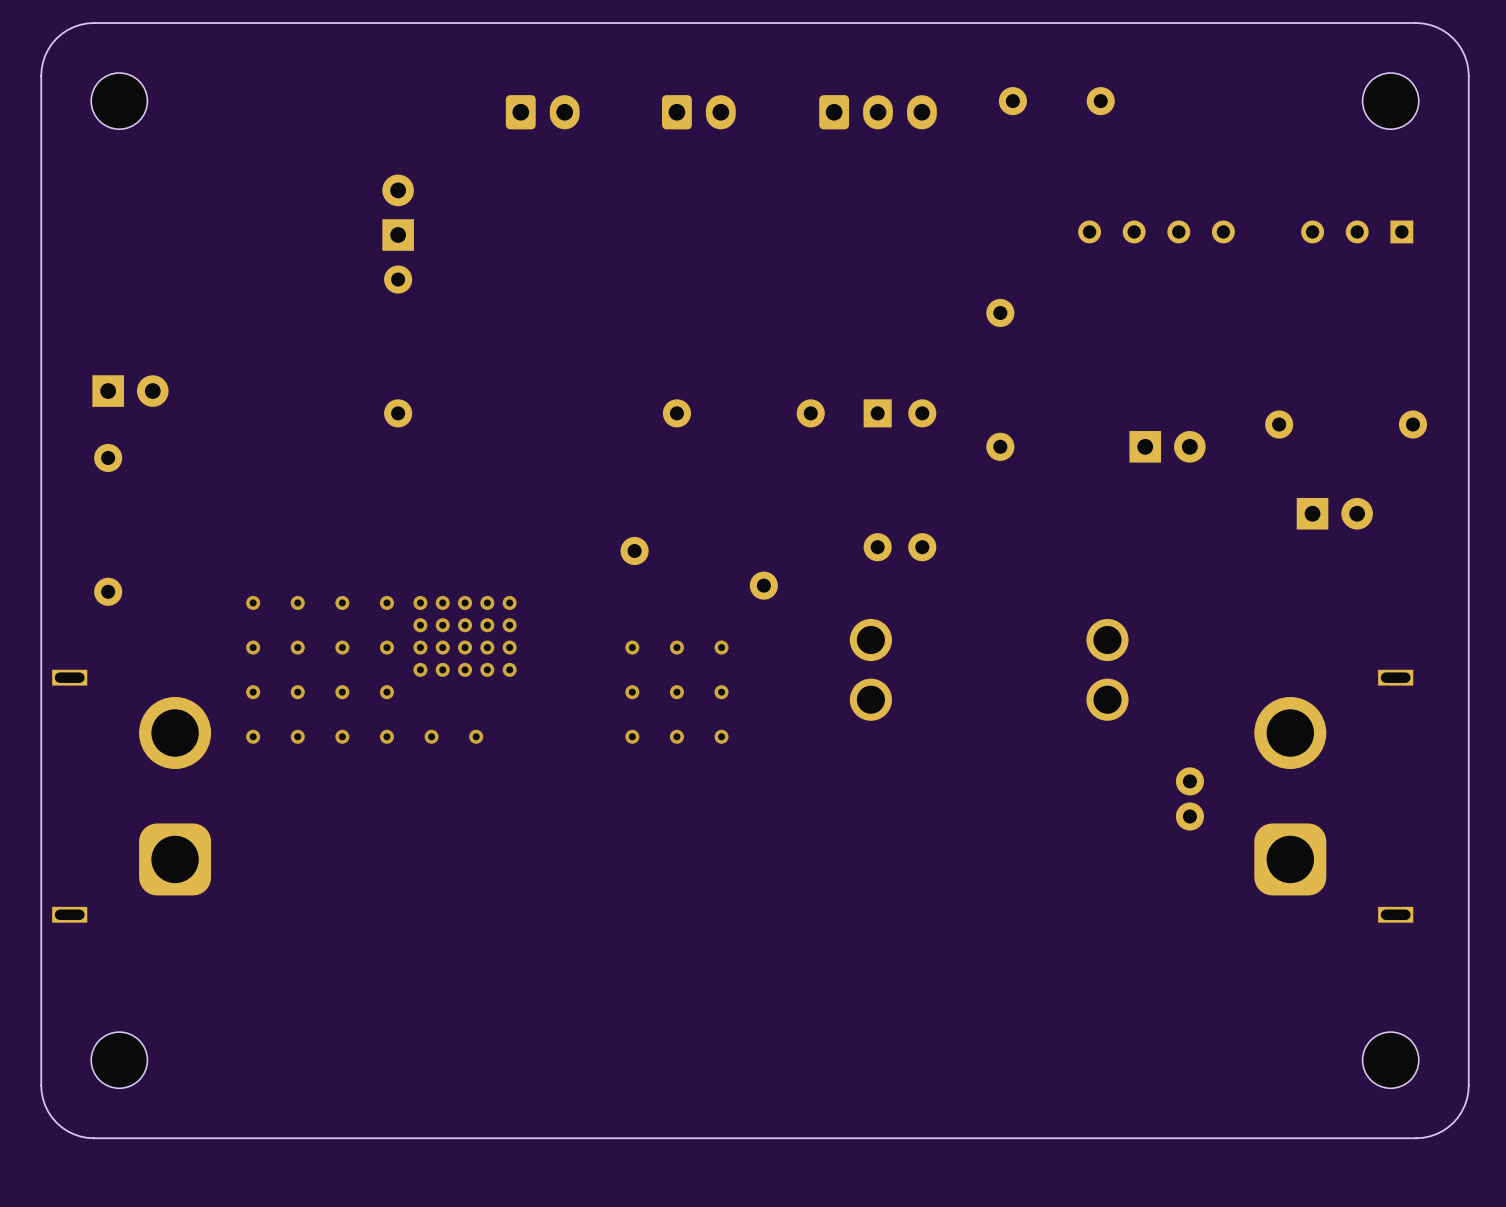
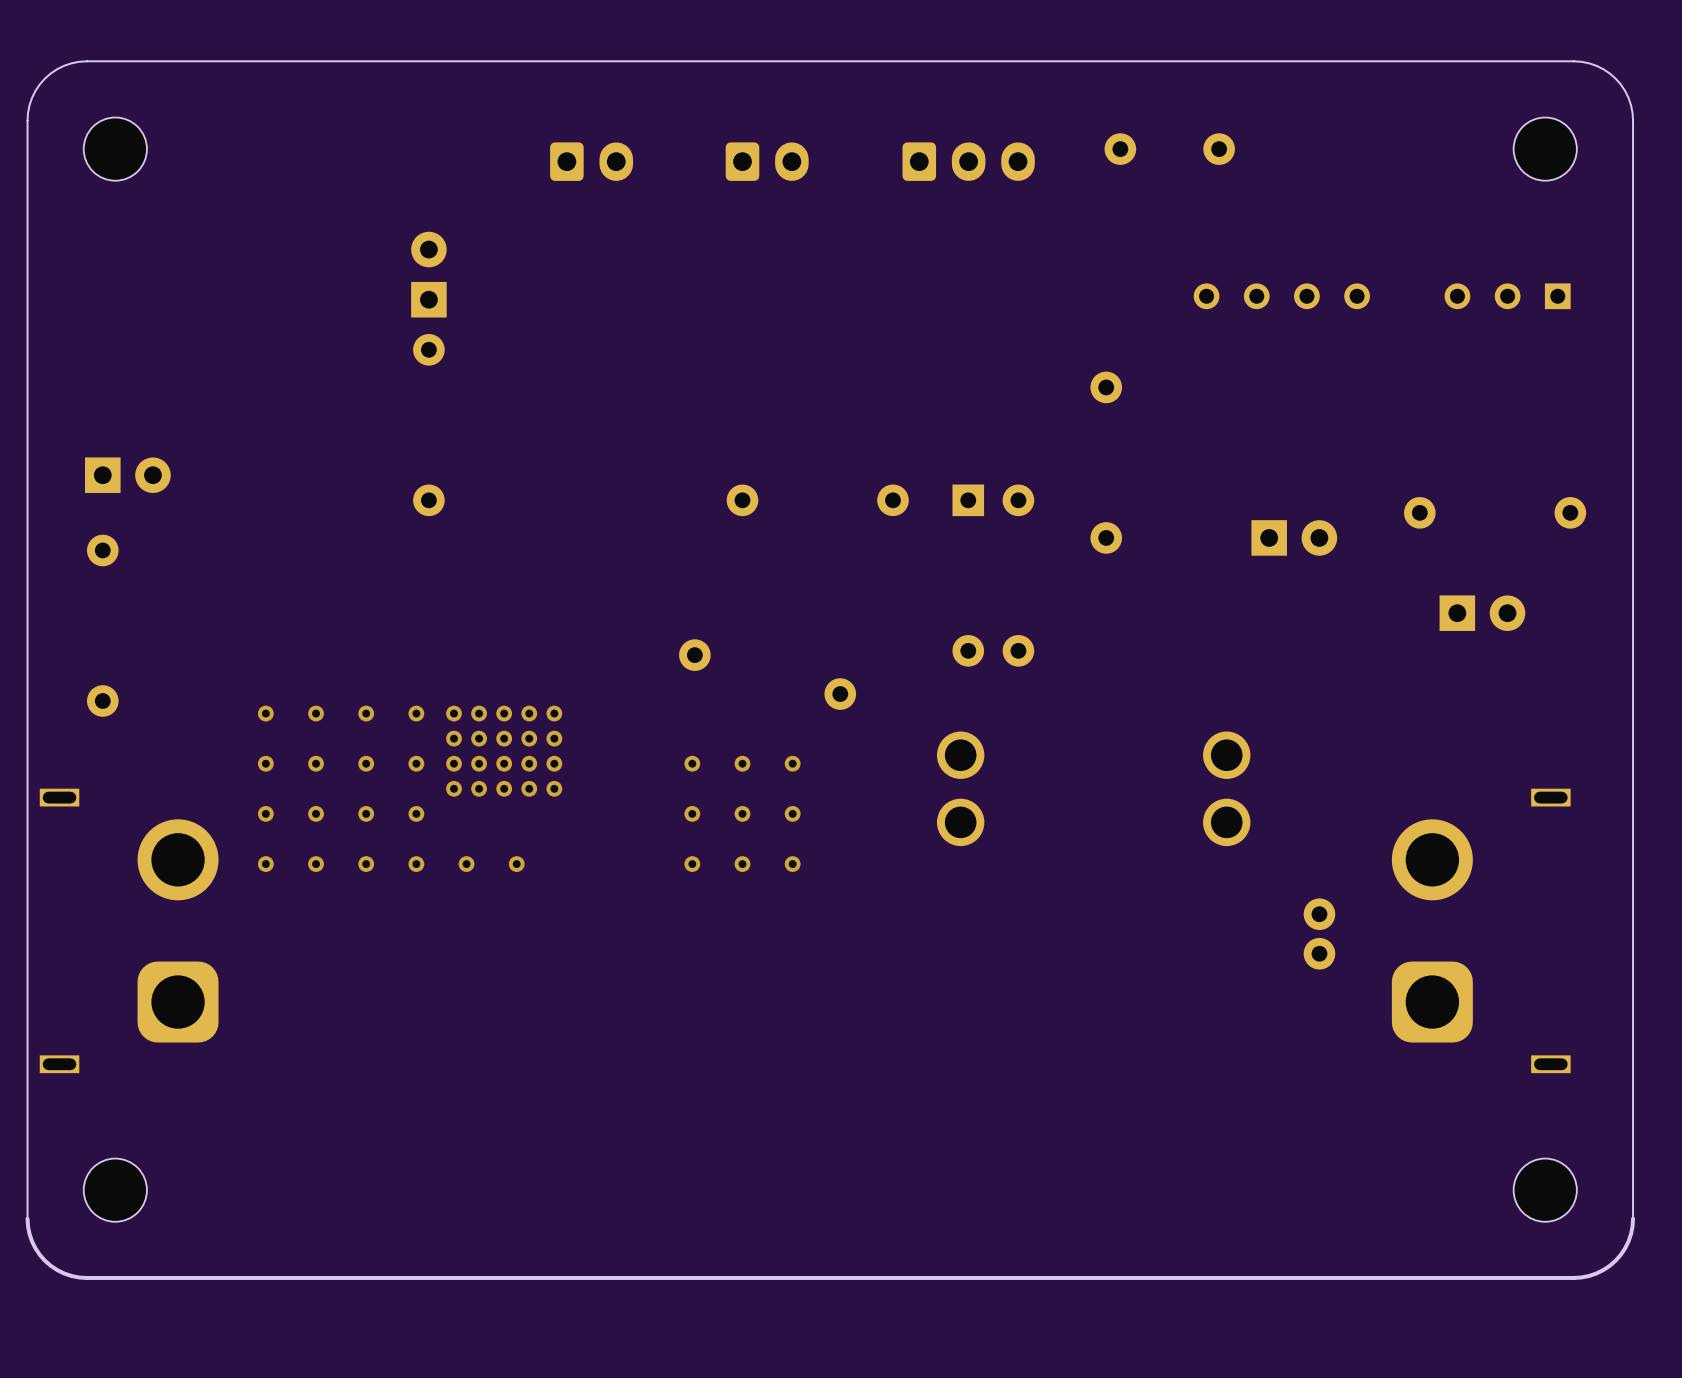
board edge: (1468, 1052) (1468, 1092) (1461, 1111) (1453, 1122) (1442, 1131) (1429, 1136) (1416, 1138) (93, 1138) (80, 1136) (67, 1131) (56, 1122) (48, 1111) (41, 1092) (41, 1052) -> (1633, 1218) (1628, 1241) (1615, 1260) (1596, 1273) (1573, 1277) (86, 1277) (64, 1273) (44, 1260) (32, 1241) (27, 1218)
part position: (119, 1060) -> (115, 1190)
part position: (1390, 1060) -> (1545, 1190)

